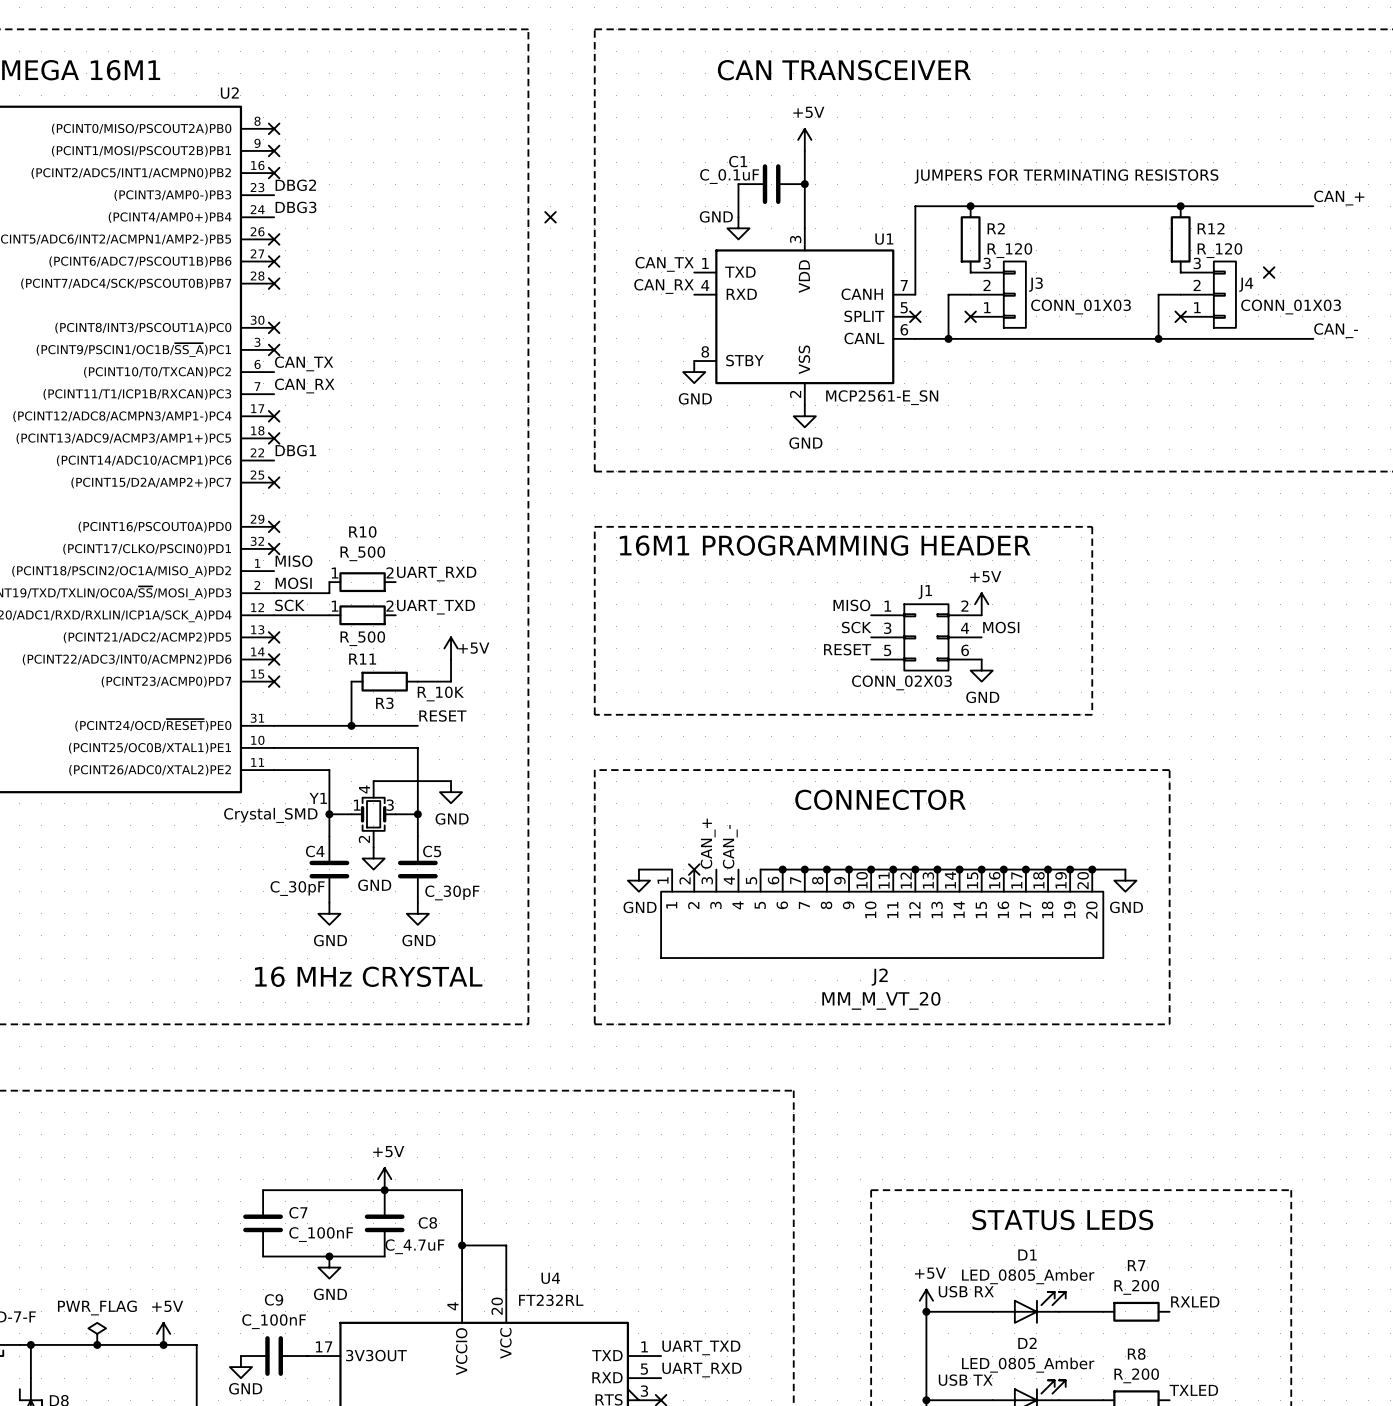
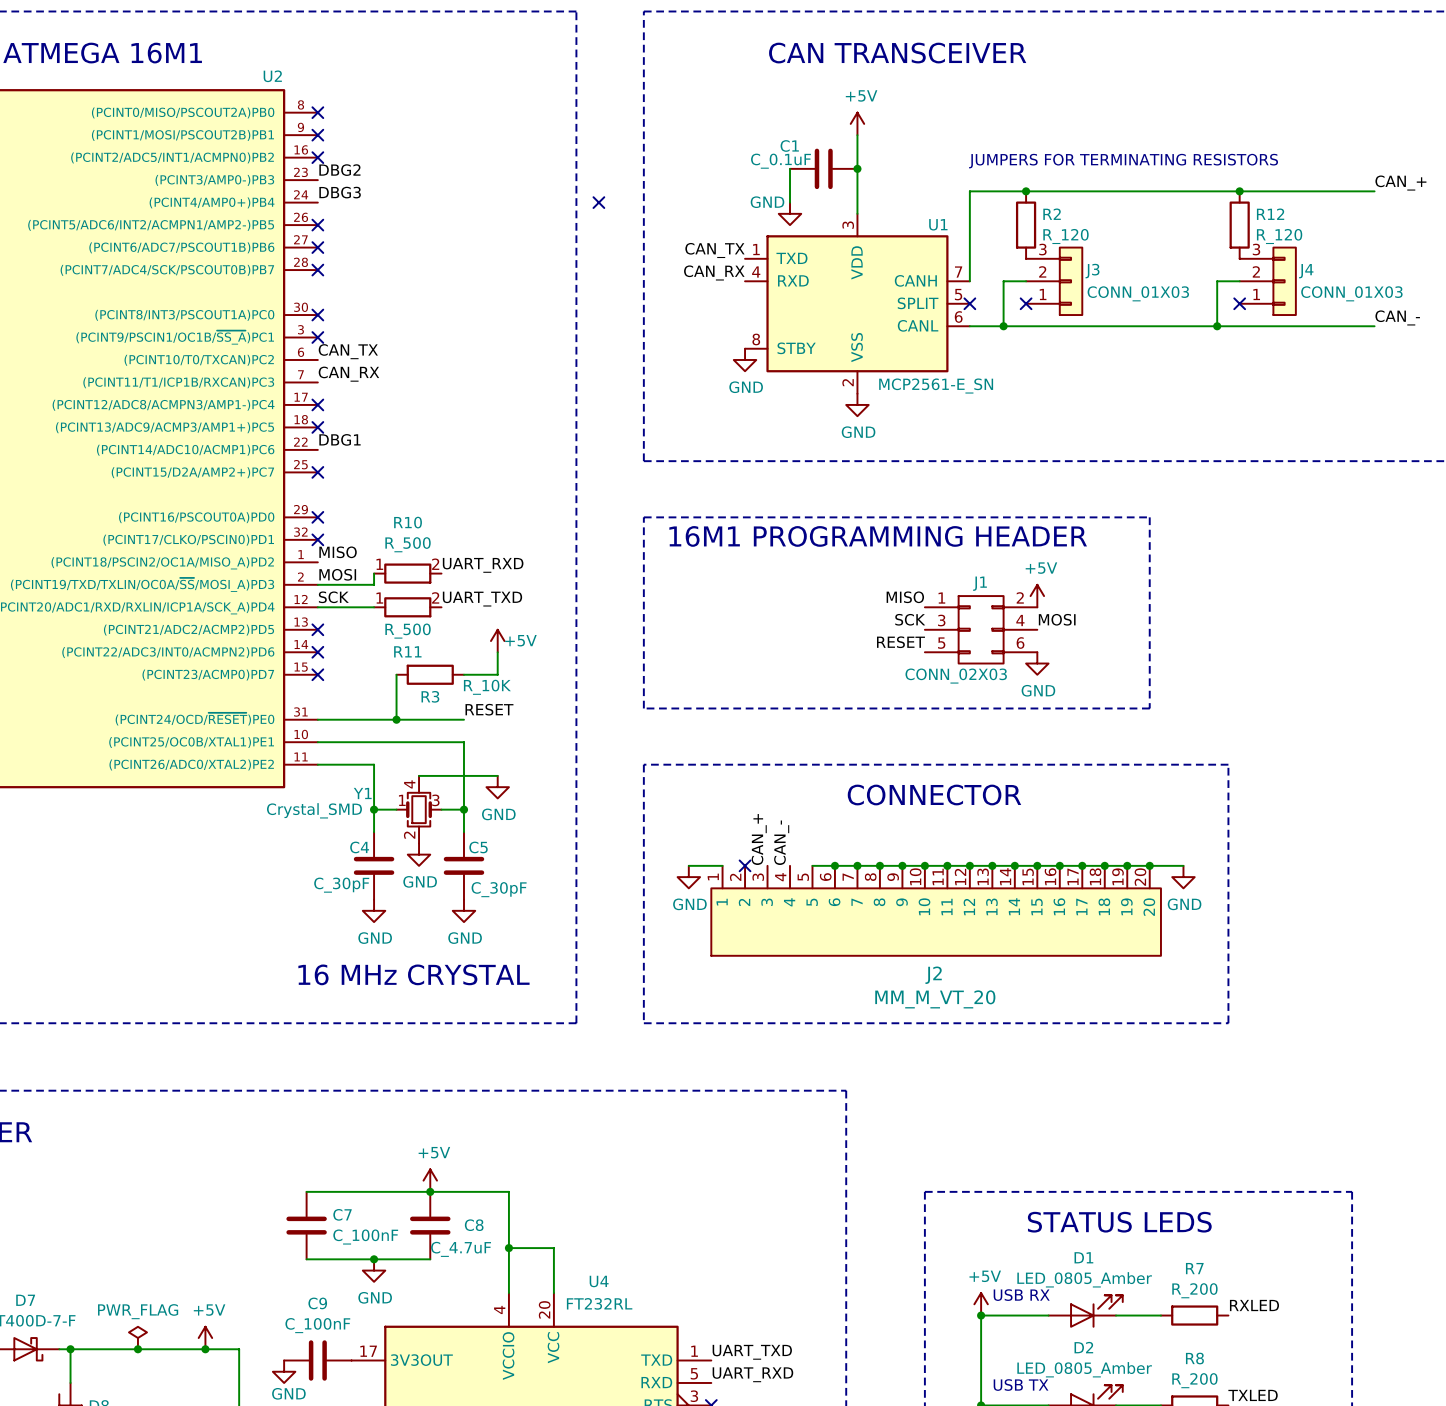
no-connect mark: (1269, 272) -> none

